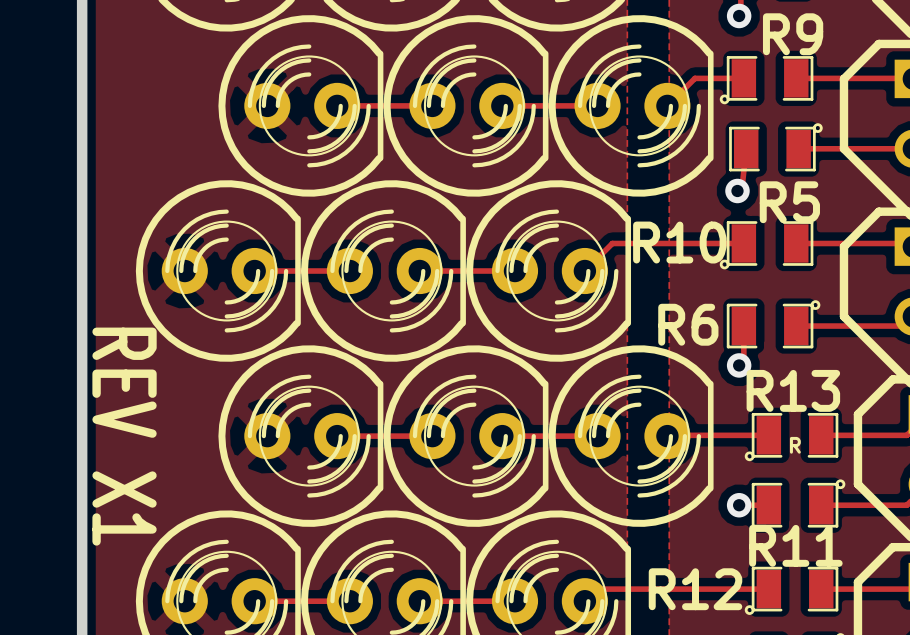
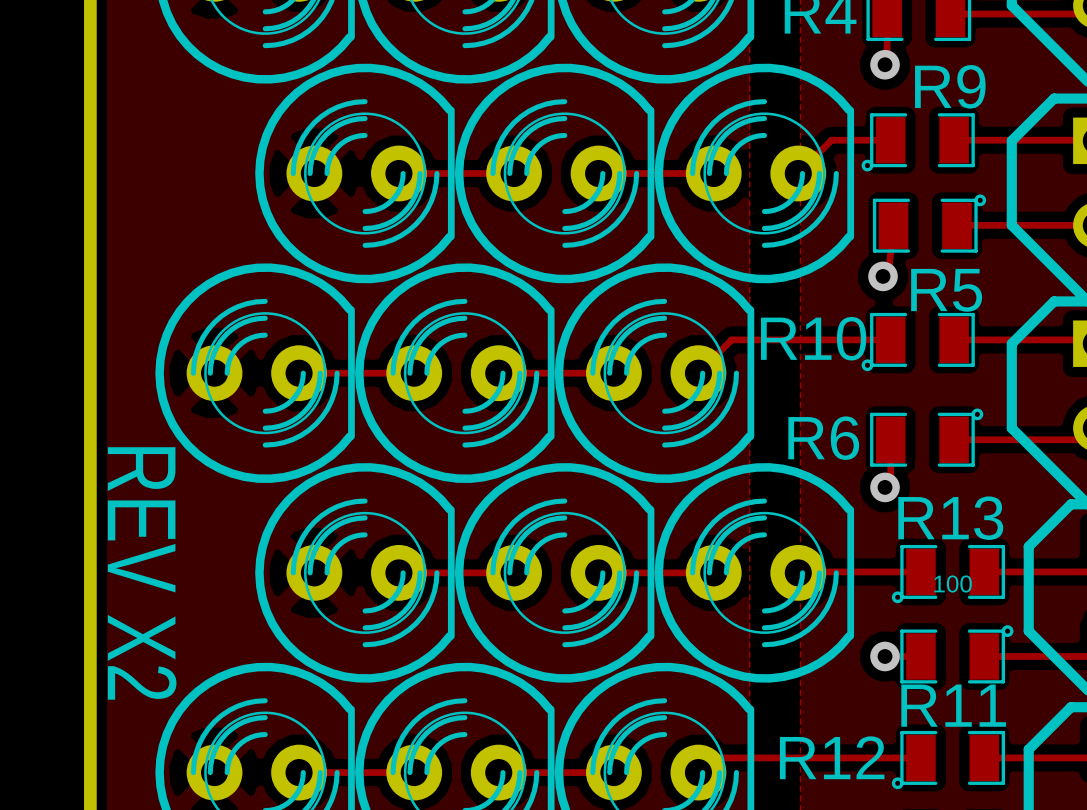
text: REV X1 (124, 436) -> REV X2 (142, 573)
R13 value: R (795, 445) -> 100 (953, 584)

